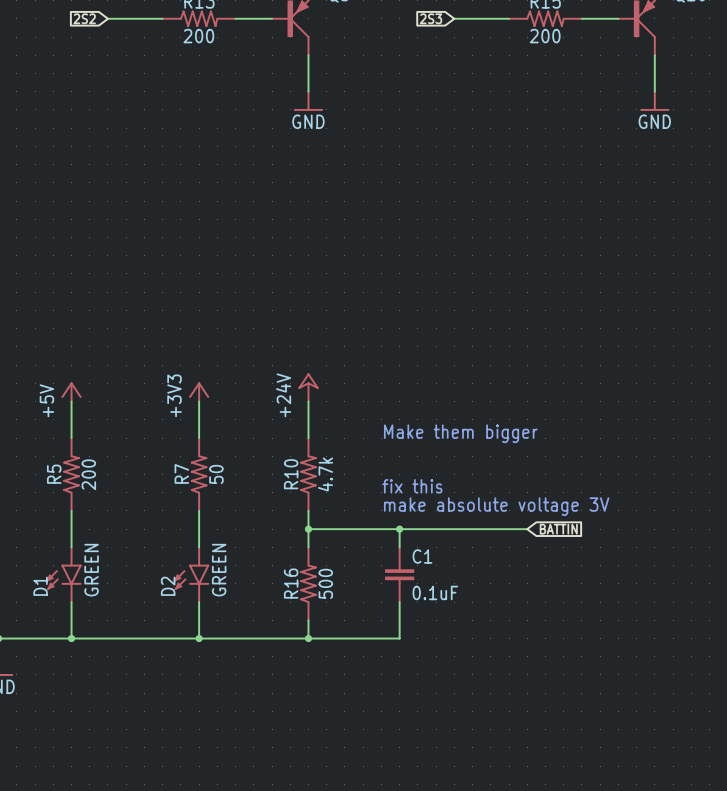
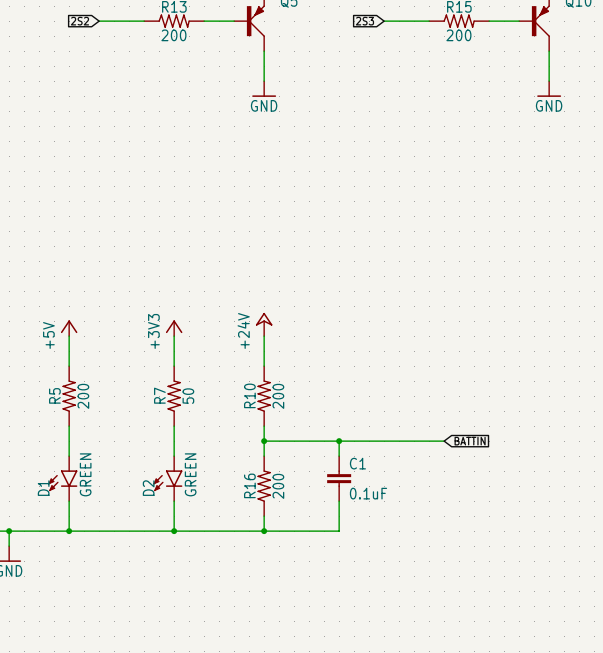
text: Make them bigger (460, 433) -> none
R10 value: 4.7k (325, 474) -> 200 (278, 396)
text: fix this (412, 486) -> none
text: make absolute voltage 3V (496, 506) -> none
R16 value: 500 (325, 583) -> 200 (278, 486)

